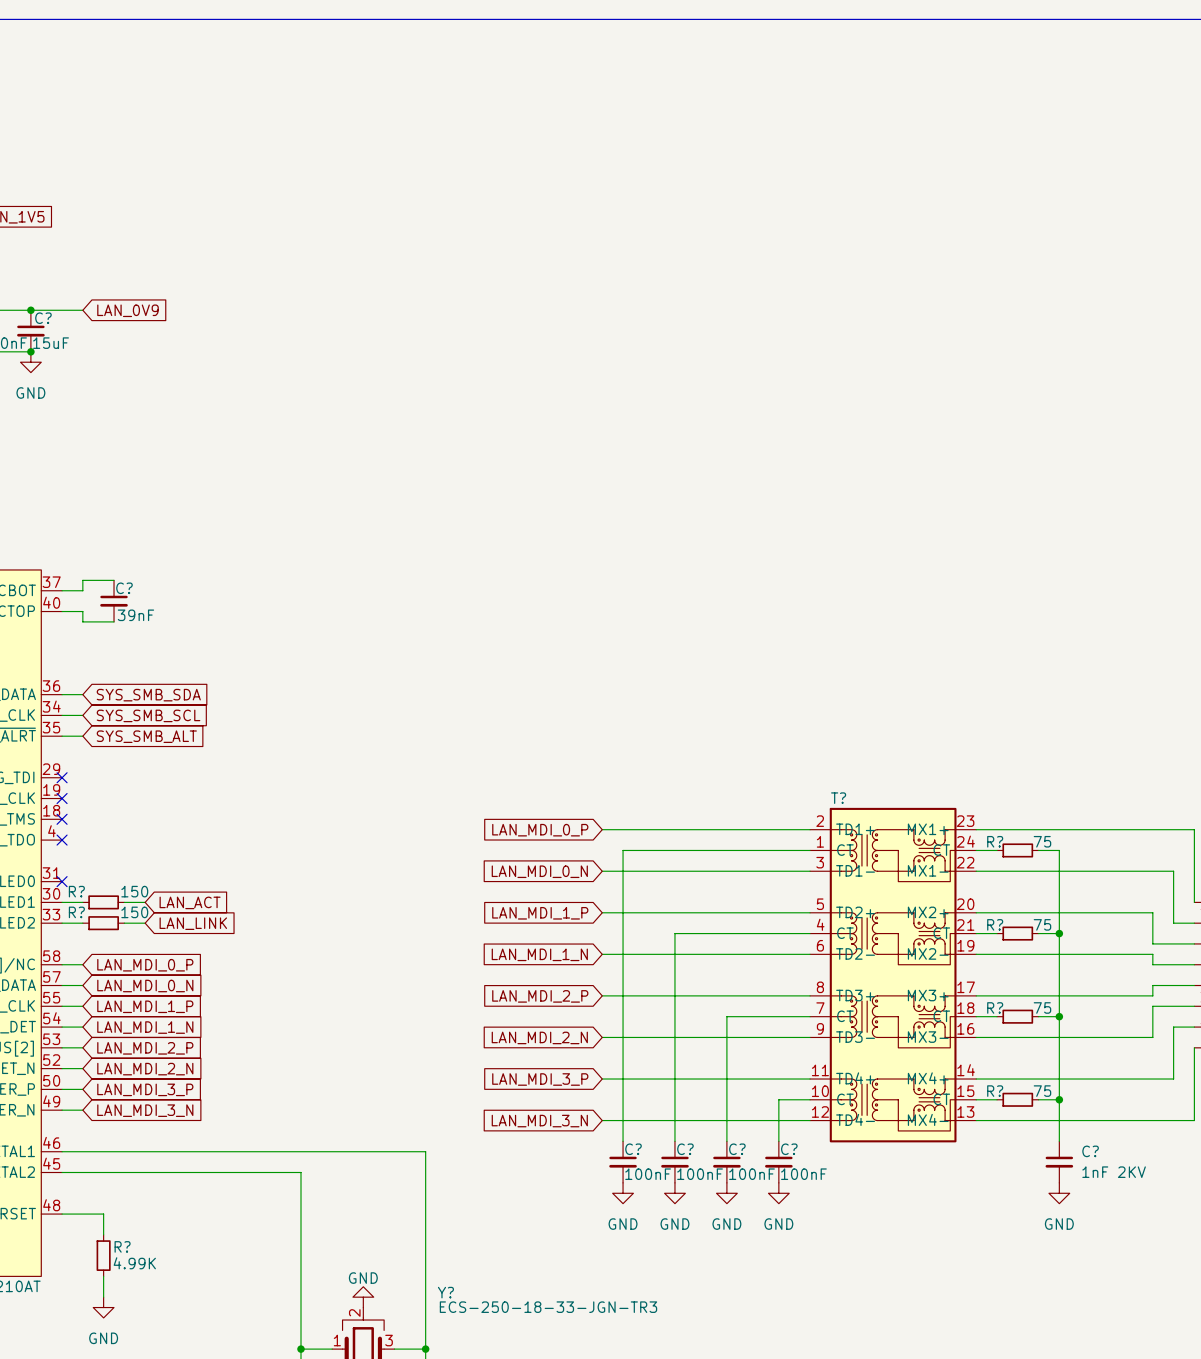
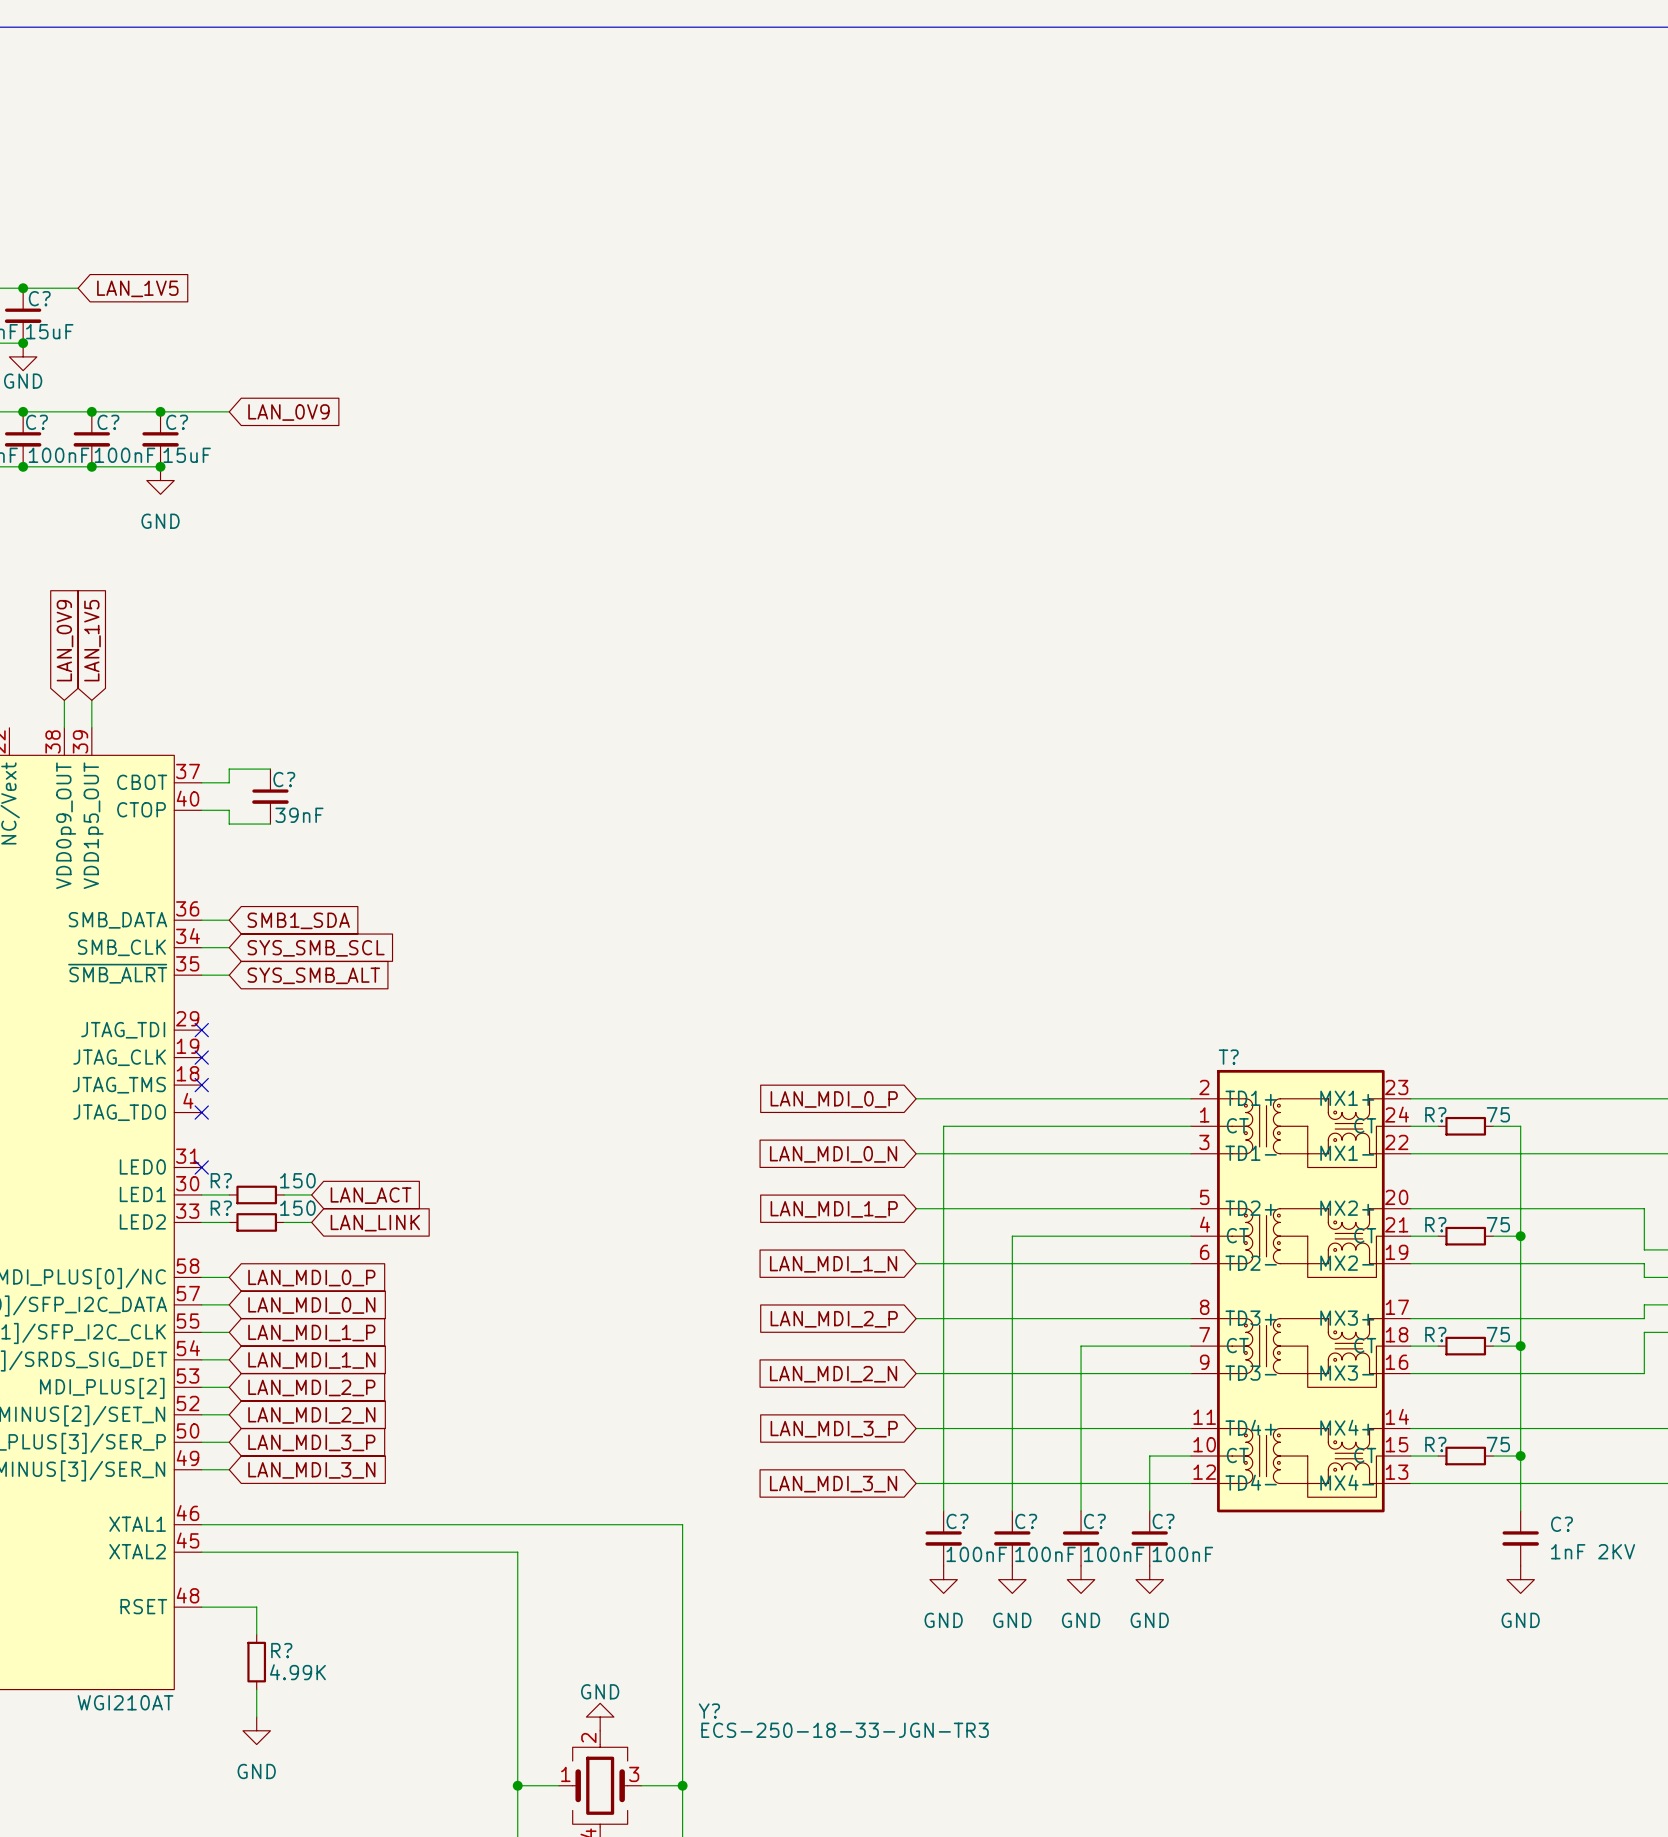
global label: SYS_SMB_SDA (148, 695) -> SMB1_SDA (298, 920)

